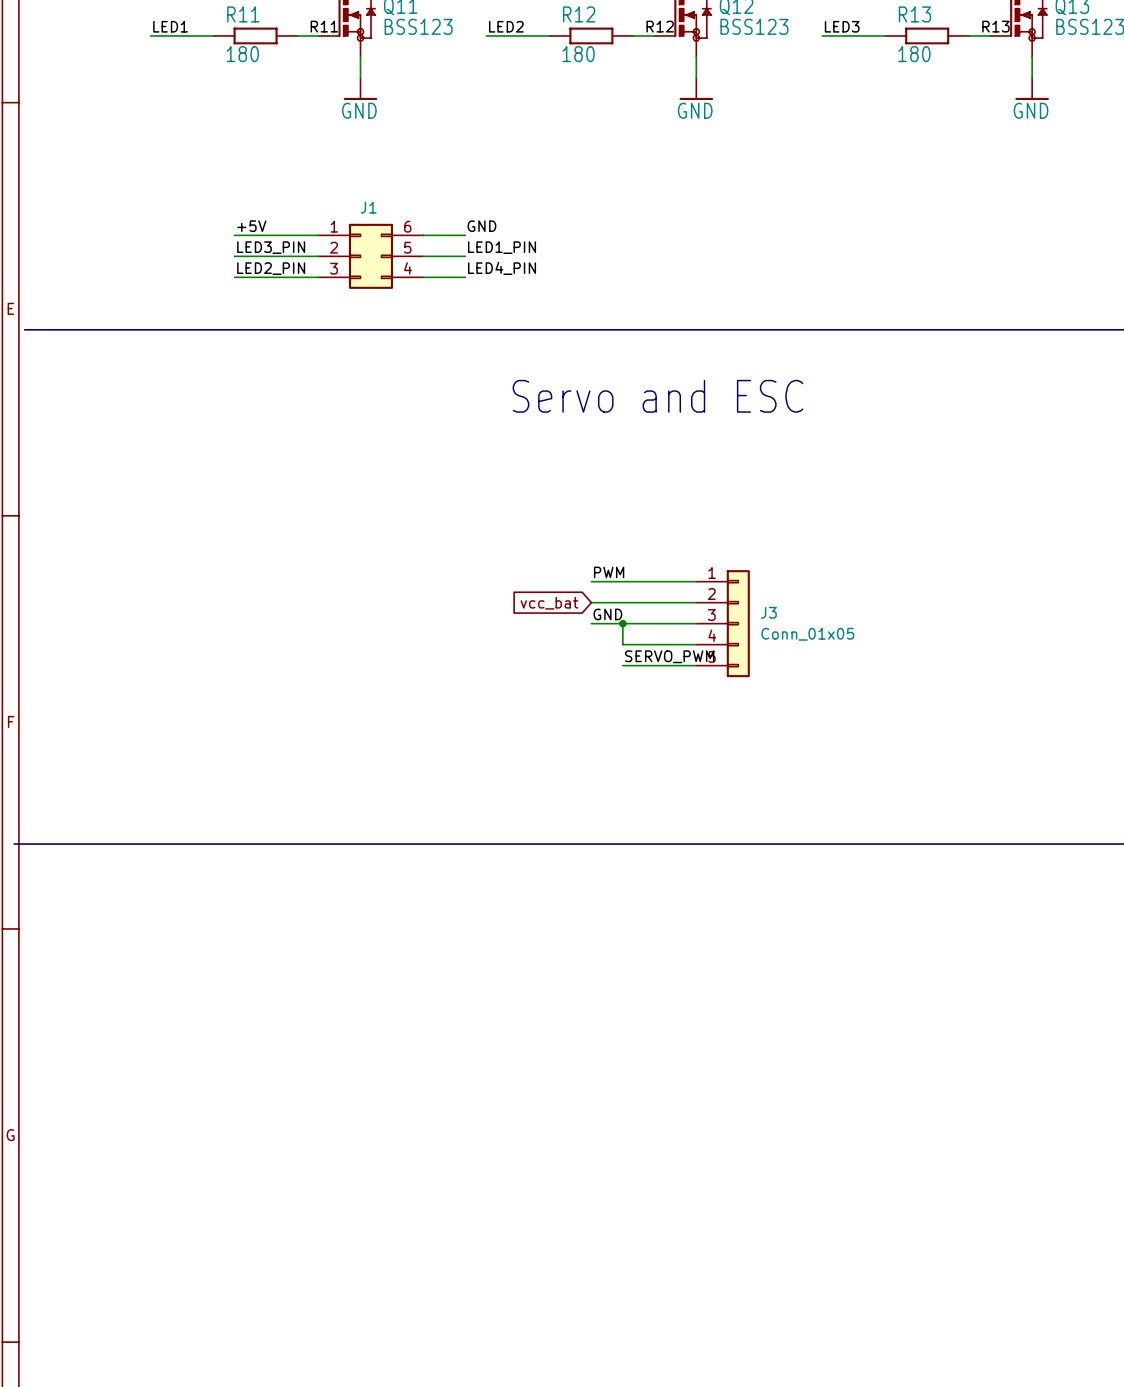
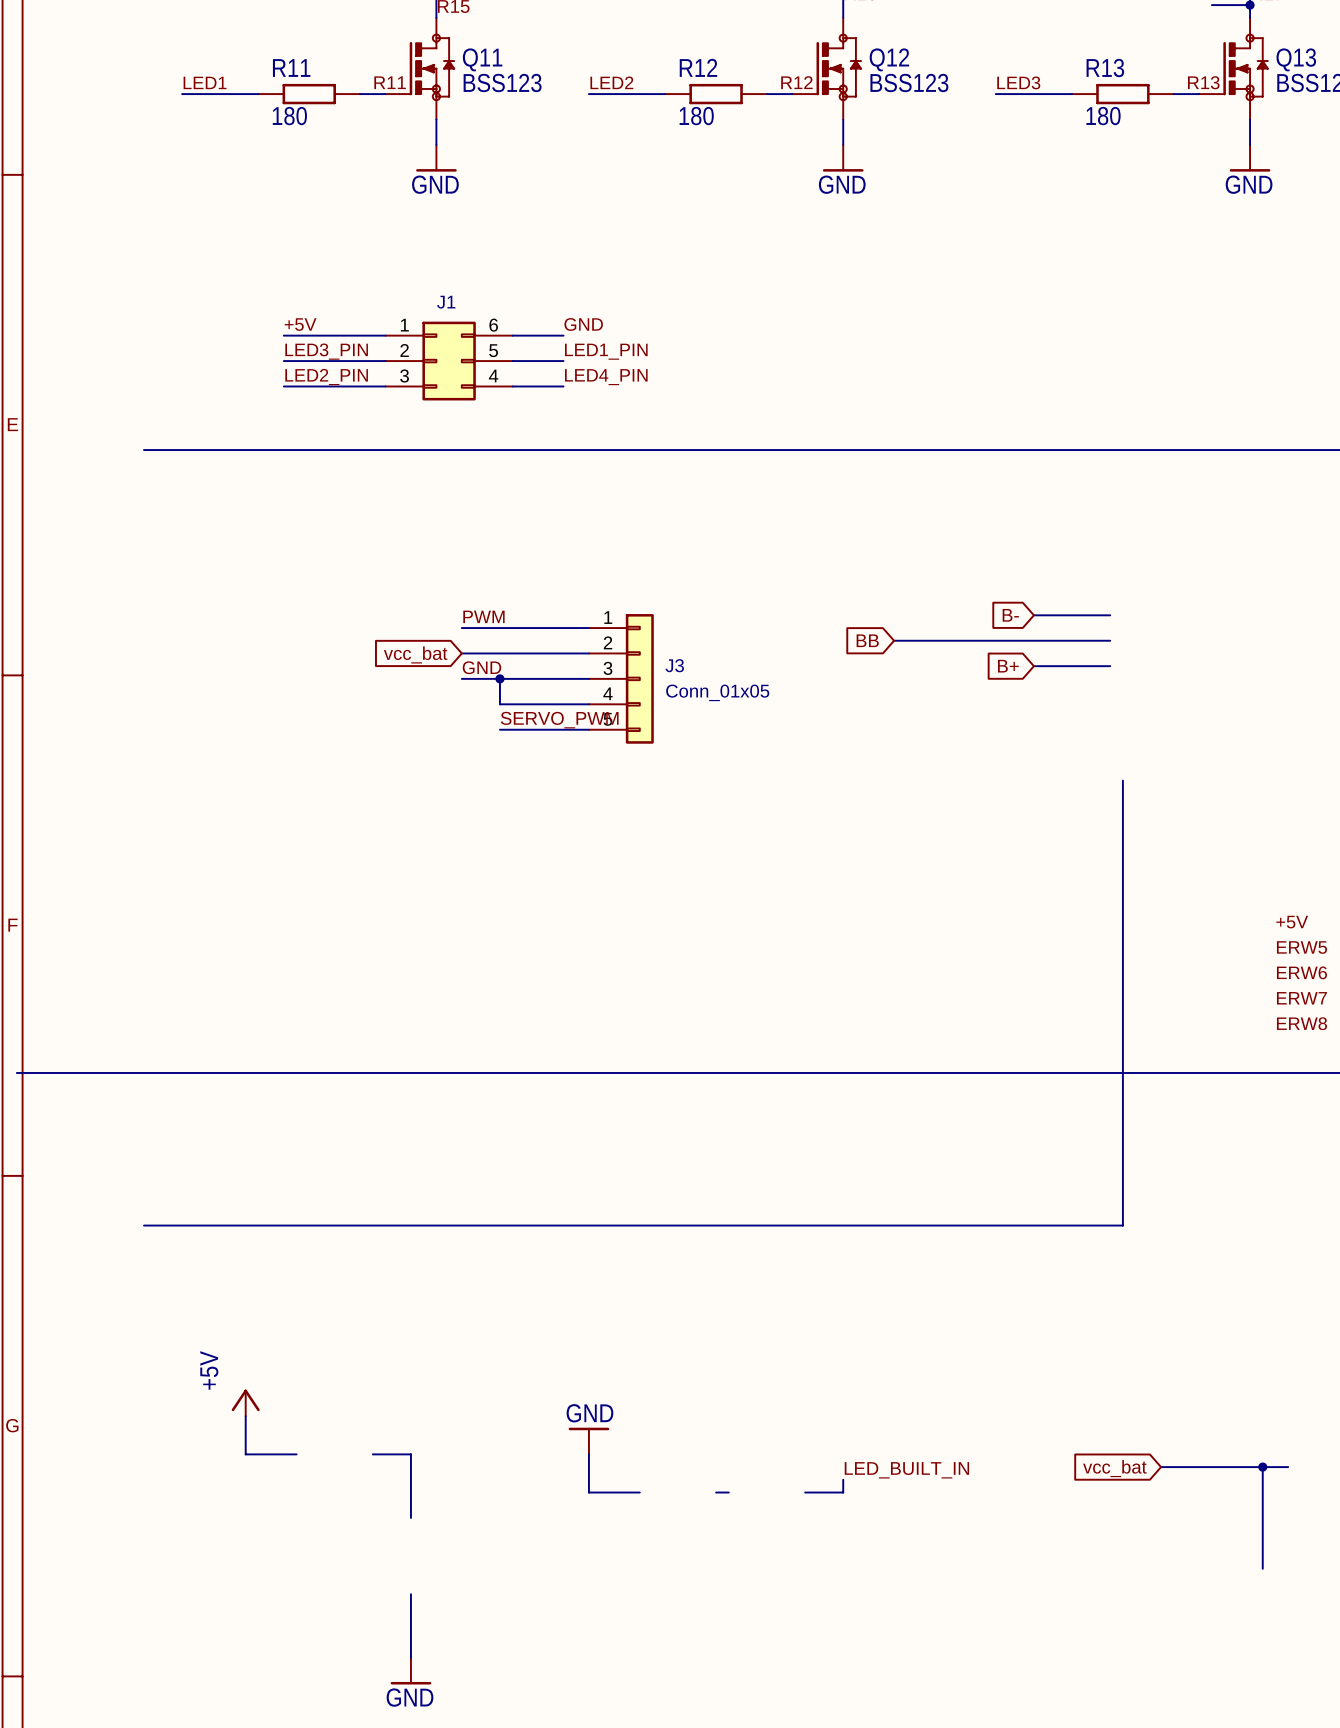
line: (24, 329) (119, 329) -> none
text: Servo and ESC (657, 396) -> none
global label: none -> B- (1010, 615)
wire: none -> (1033, 615) (1110, 615)
label: none -> PWM (483, 616)
wire: none -> (461, 628) (588, 628)
global label: none -> BB (867, 640)
wire: none -> (894, 640) (1110, 640)
wire: none -> (461, 653) (588, 653)
global label: none -> vcc_bat (415, 654)
global label: none -> B+ (1008, 666)
wire: none -> (1033, 666) (1110, 666)
label: none -> GND (481, 667)
wire: none -> (461, 678) (588, 678)
wire: none -> (499, 678) (499, 704) (588, 704)
junction: none -> (499, 678)
label: none -> SERVO_PWM (559, 720)
wire: none -> (499, 729) (588, 729)
label: PWM (609, 572) -> none
wire: (591, 581) (696, 581) -> none
wire: (591, 602) (696, 602) -> none
line: none -> (1122, 780) (1122, 1225) (143, 1225)
global label: vcc_bat (549, 603) -> none
label: GND (607, 614) -> none
wire: (591, 623) (696, 623) -> none
wire: (622, 623) (622, 644) (696, 644) -> none
junction: (622, 623) -> none
J3 position: (723, 623) -> (621, 678)
label: SERVO_PWM (669, 656) -> none
wire: (622, 665) (696, 665) -> none
label: none -> +5V (1292, 922)
label: none -> ERW5 (1301, 947)
label: none -> ERW6 (1301, 972)
label: none -> ERW7 (1301, 998)
label: none -> ERW8 (1301, 1023)
power symbol: none -> +5V (245, 1402)
wire: none -> (245, 1416) (245, 1454) (296, 1454)
power symbol: none -> GND (588, 1441)
wire: none -> (372, 1454) (410, 1454) (410, 1517)
wire: none -> (588, 1454) (588, 1492) (639, 1492)
global label: none -> vcc_bat (1114, 1468)
wire: none -> (1161, 1467) (1288, 1467)
wire: none -> (1262, 1467) (1262, 1568)
junction: none -> (1262, 1467)
label: none -> LED_BUILT_IN (906, 1470)
wire: none -> (843, 1479) (843, 1492) (805, 1492)
wire: none -> (716, 1492) (728, 1492)
wire: none -> (410, 1594) (410, 1657)
power symbol: none -> GND (410, 1671)

